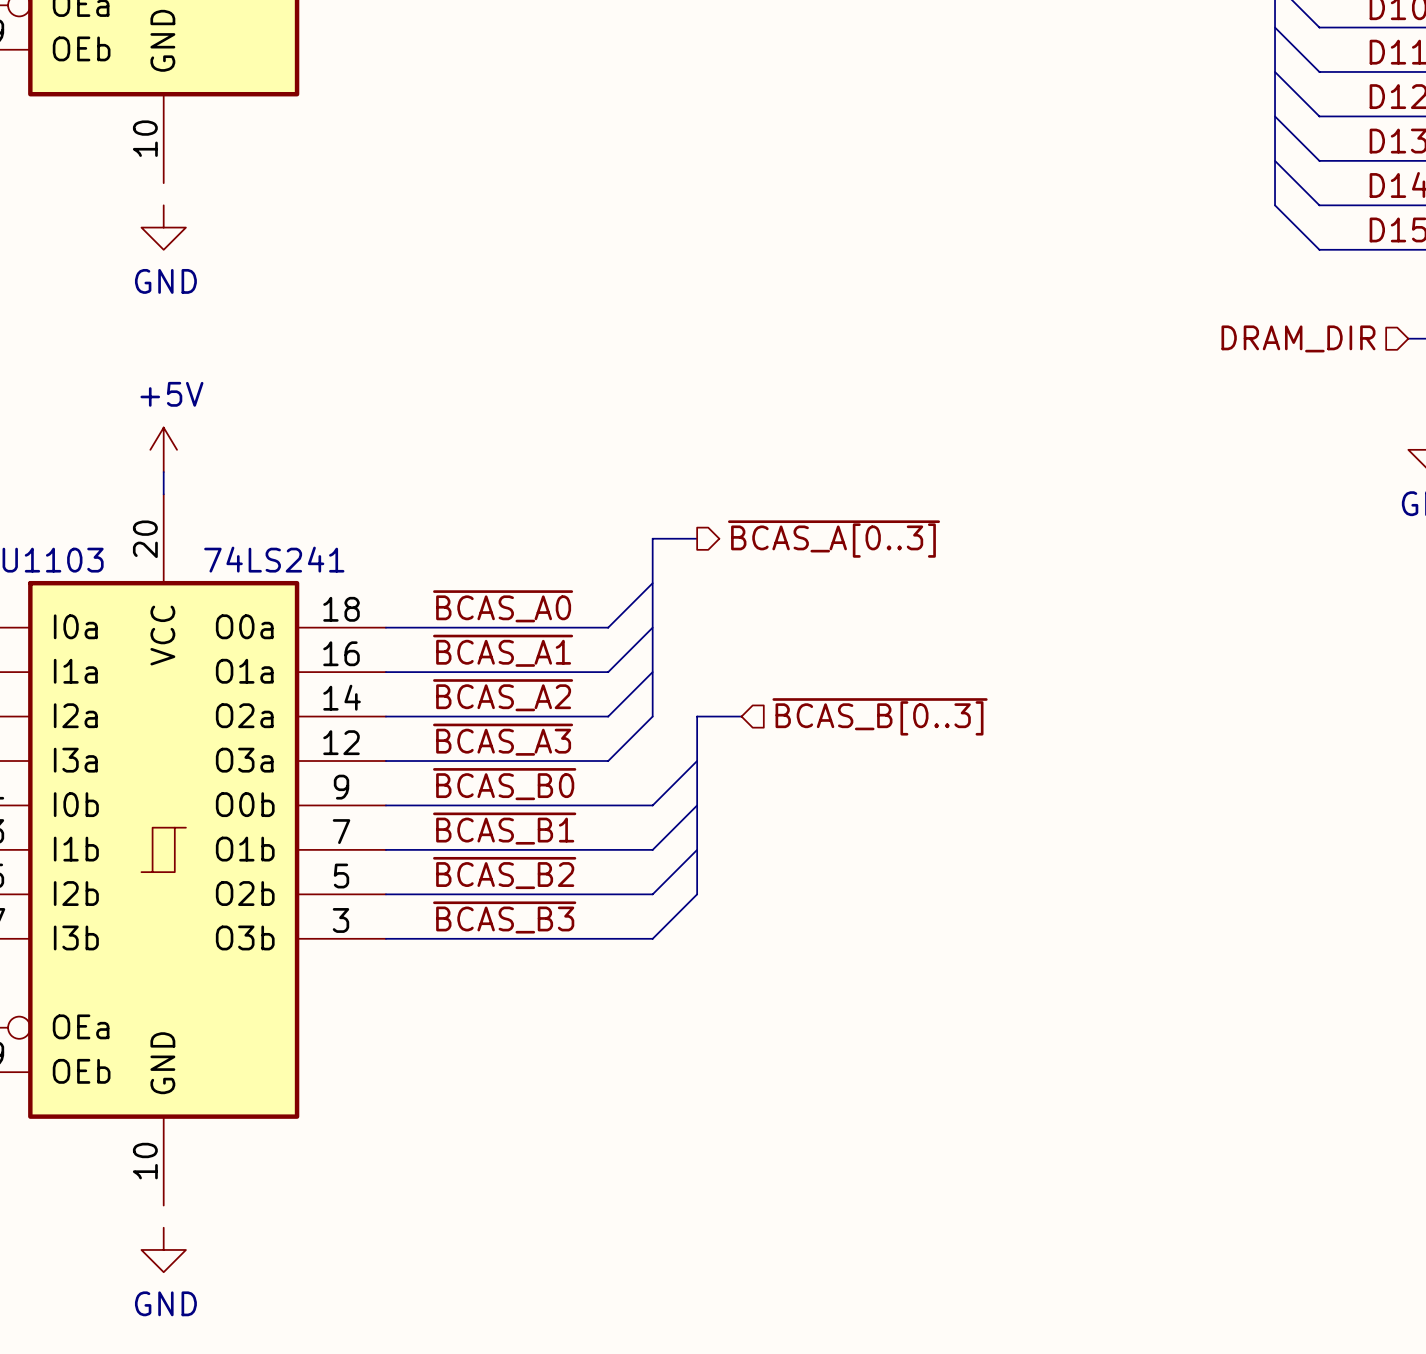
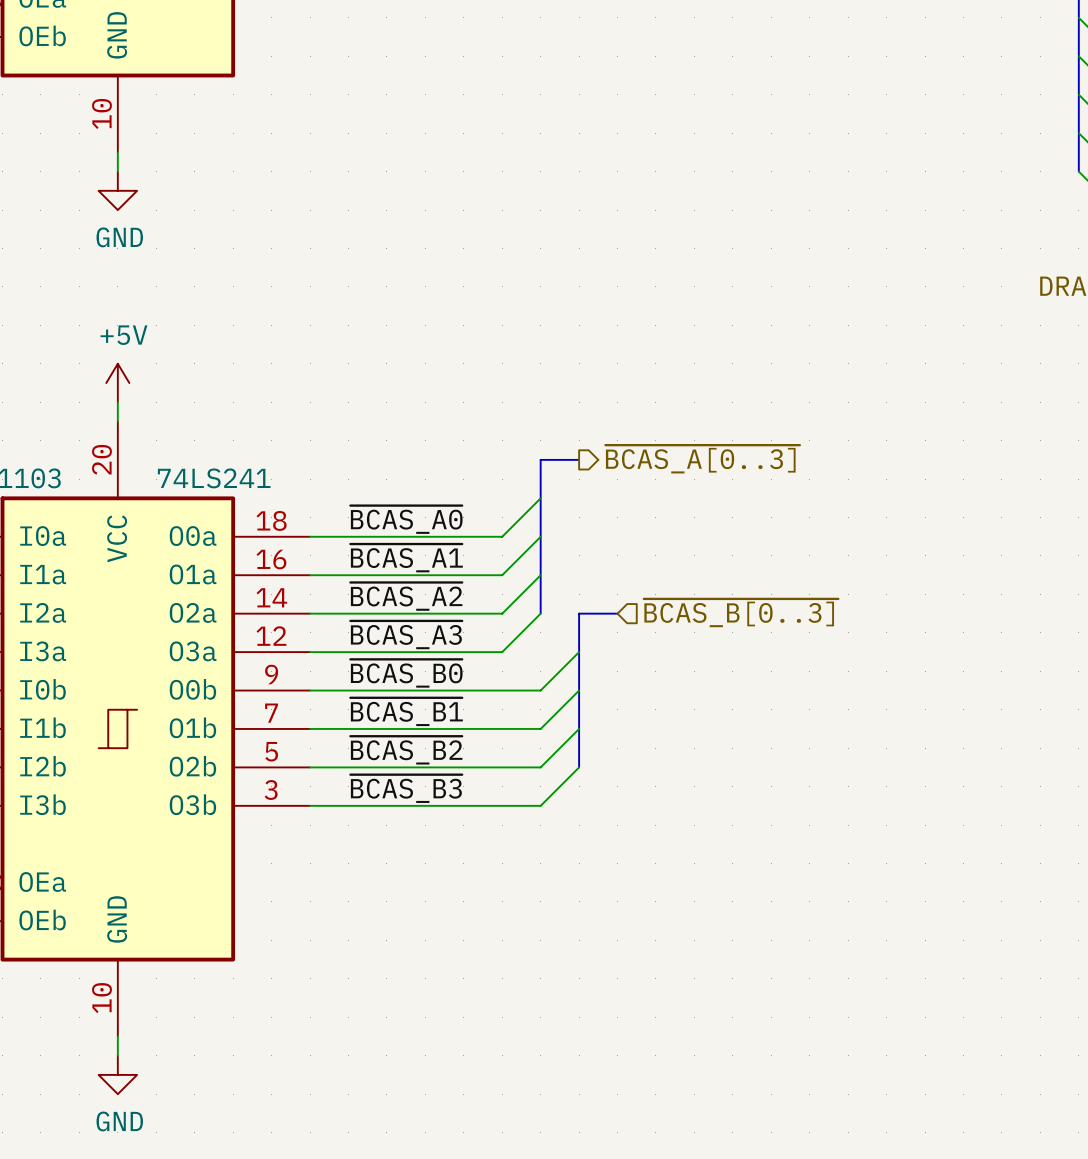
wire: none -> (117, 152) (117, 171)
wire: none -> (117, 1036) (117, 1055)

